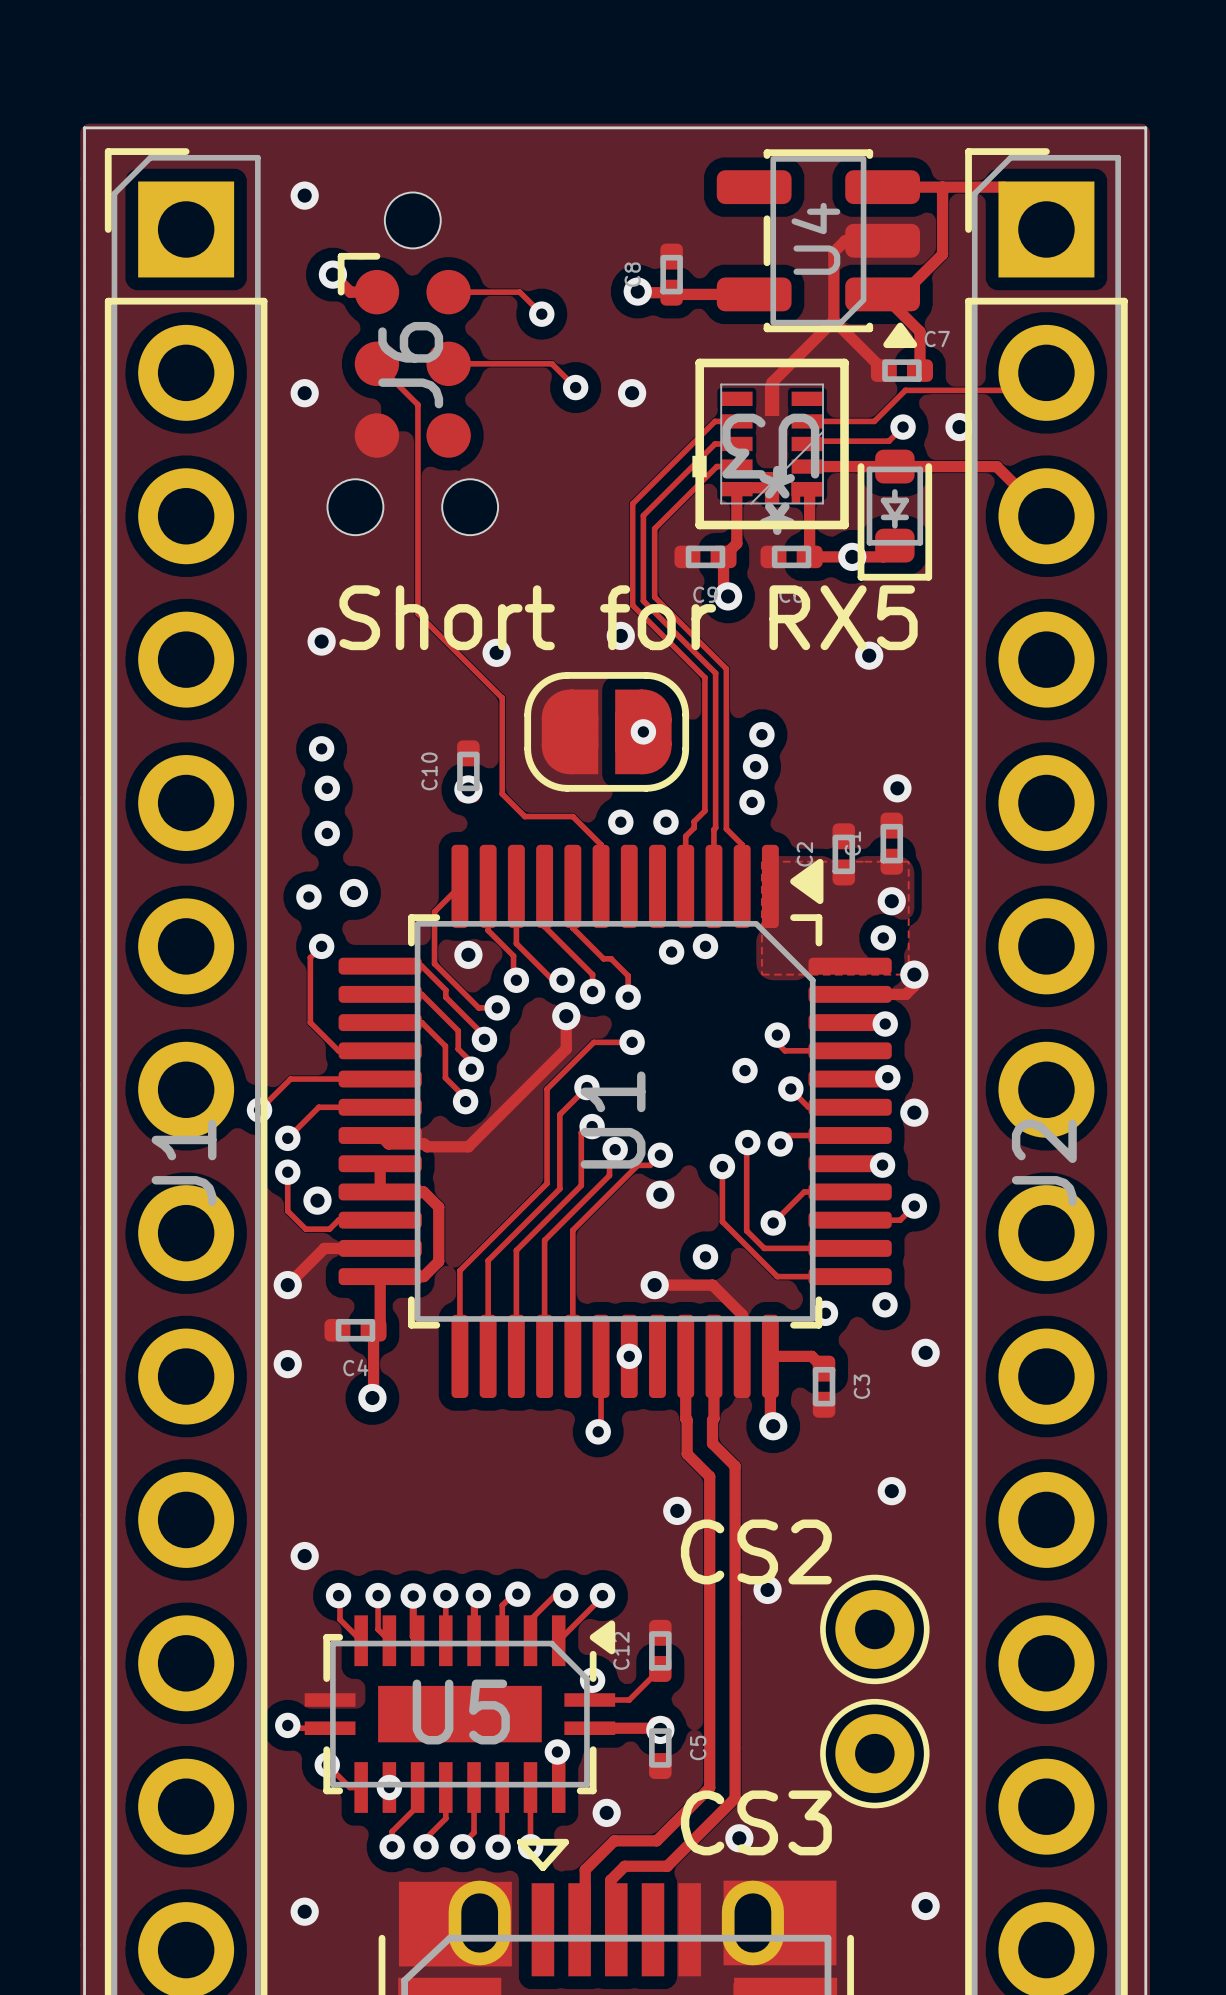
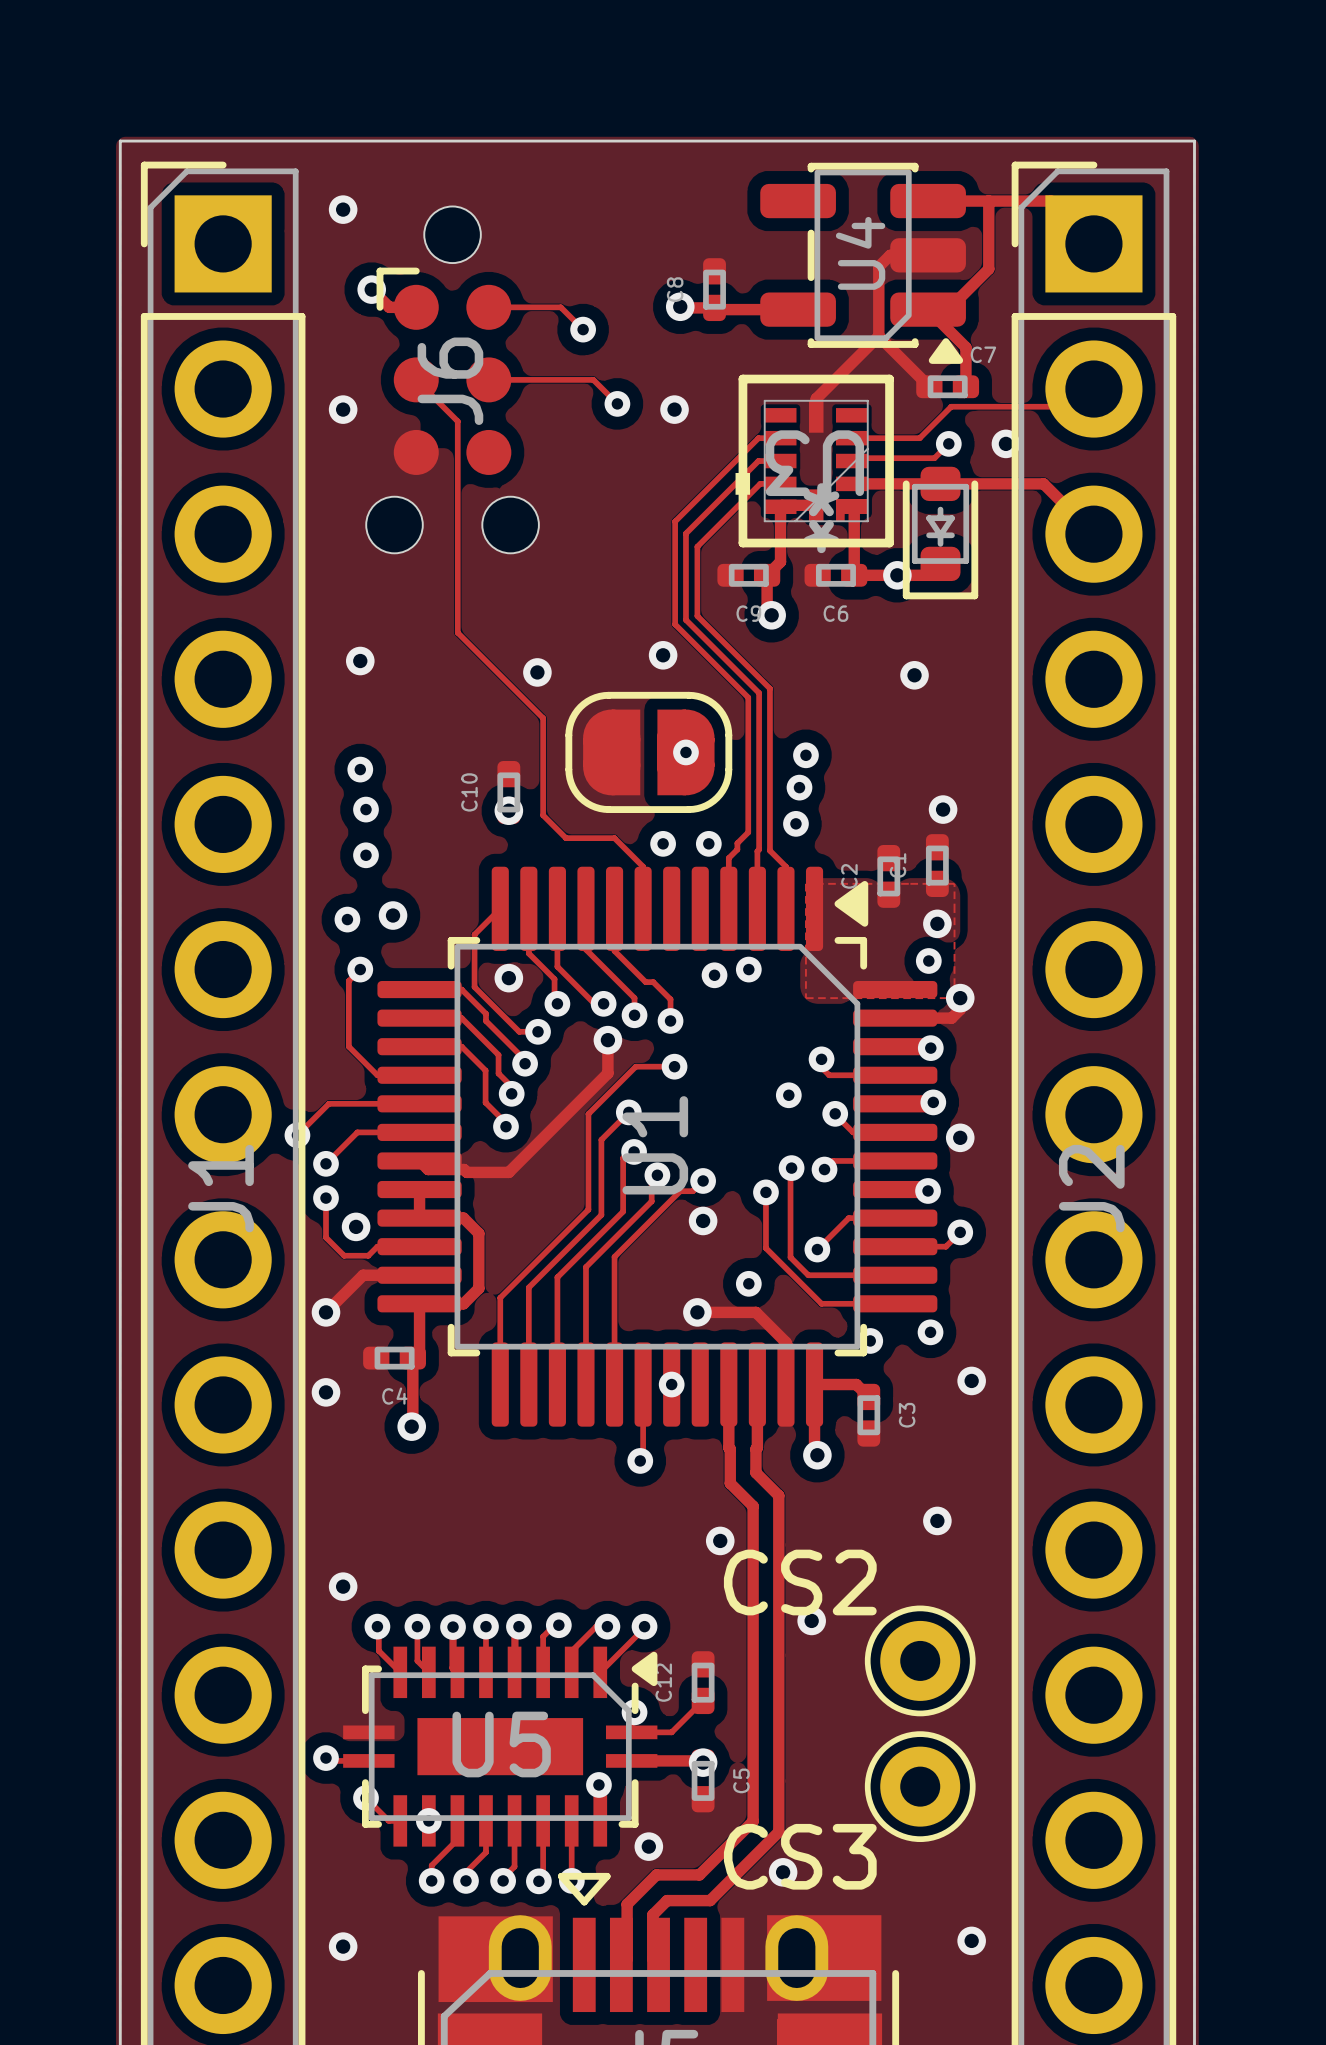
text: Short for RX5 (628, 617) -> none

